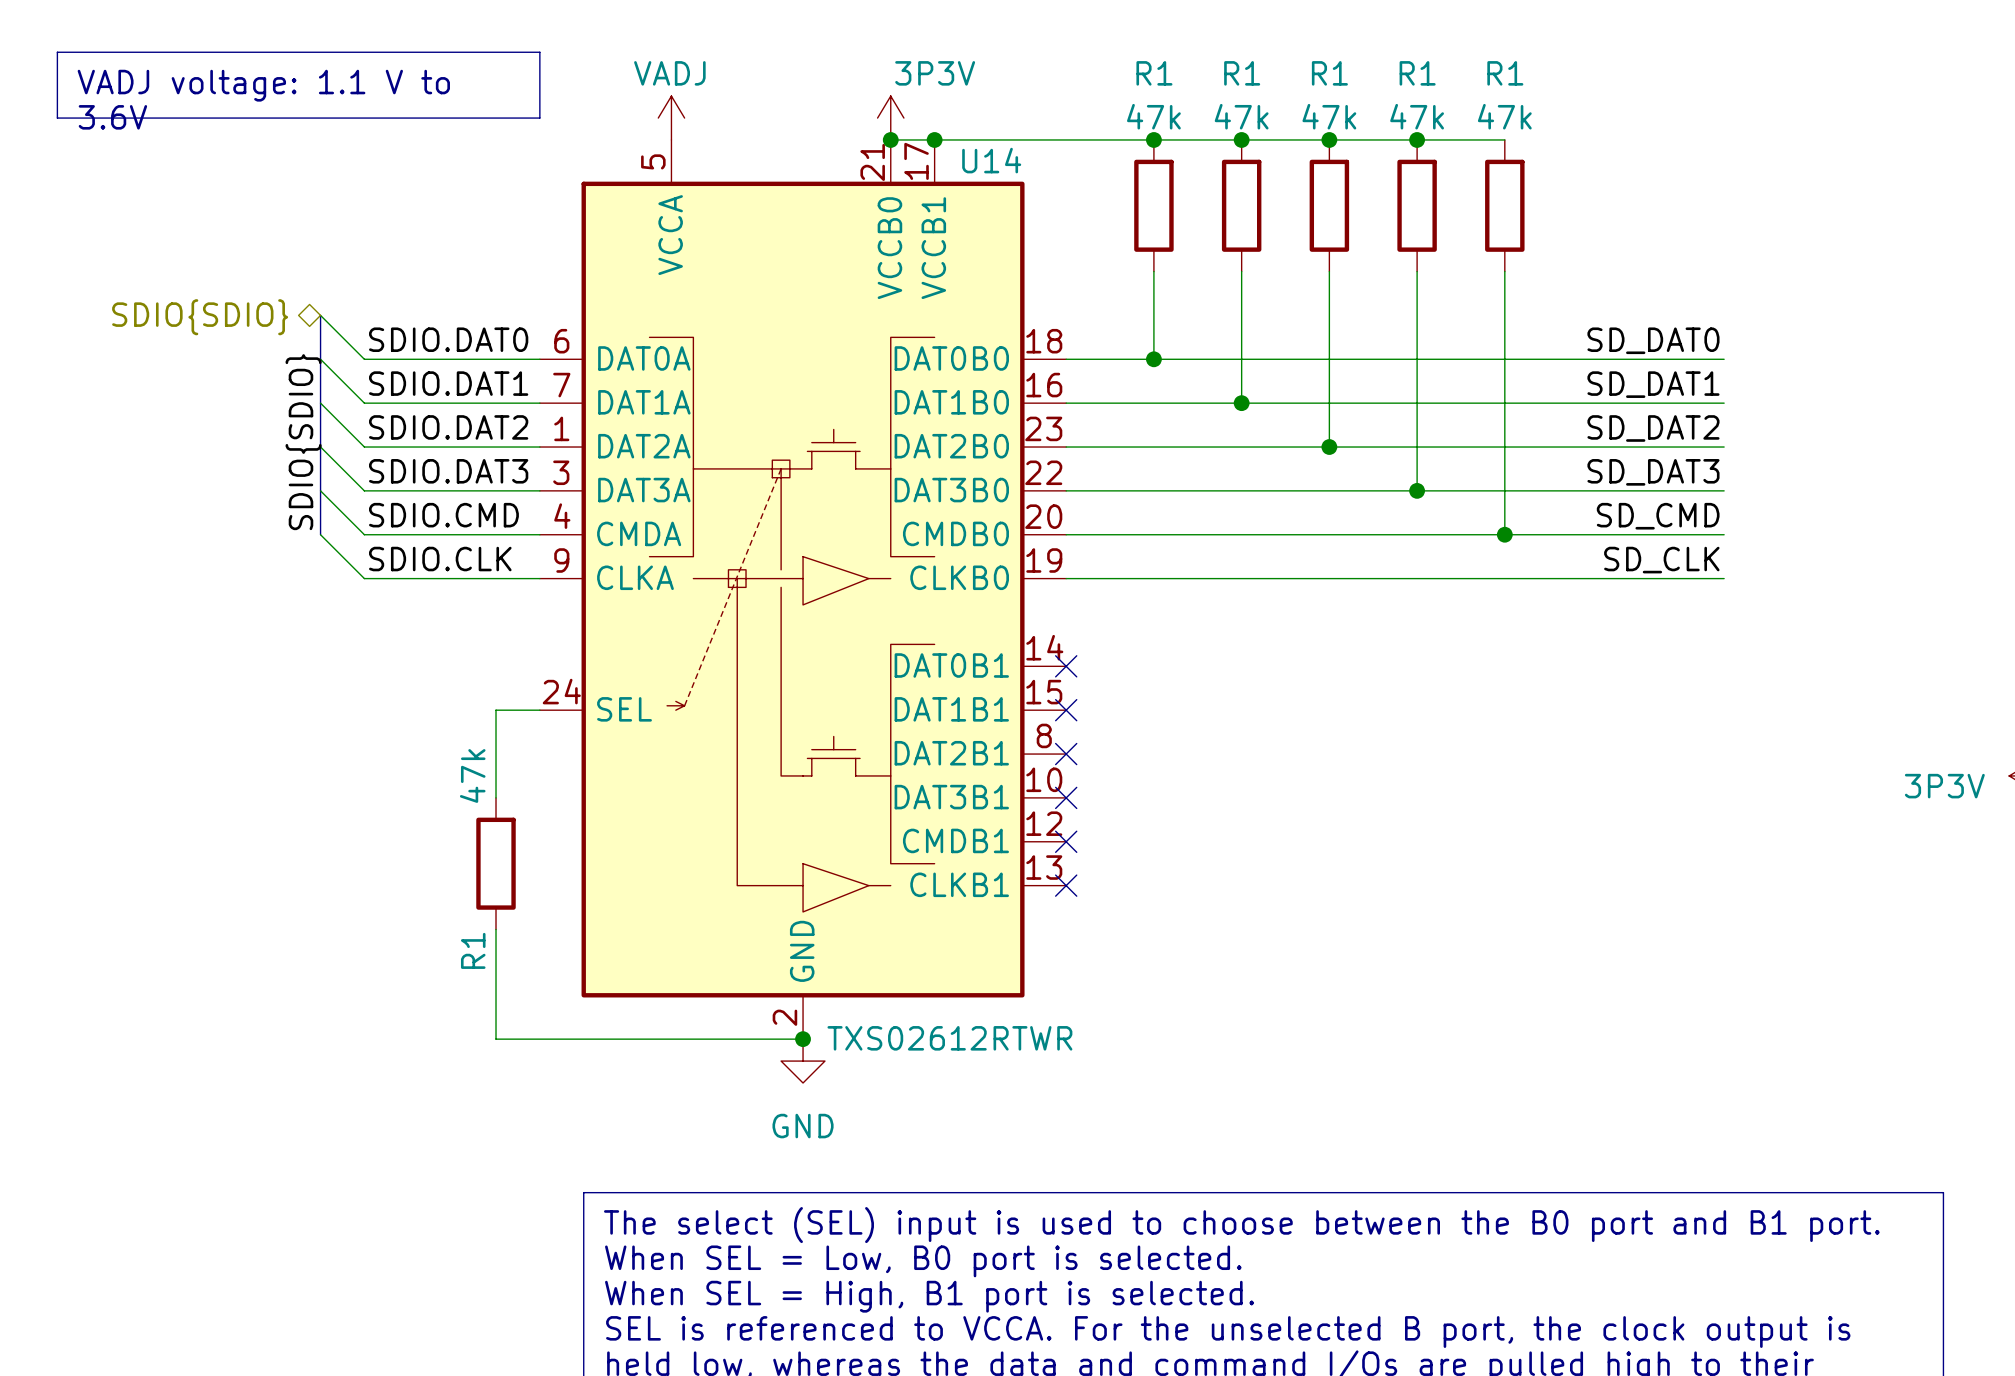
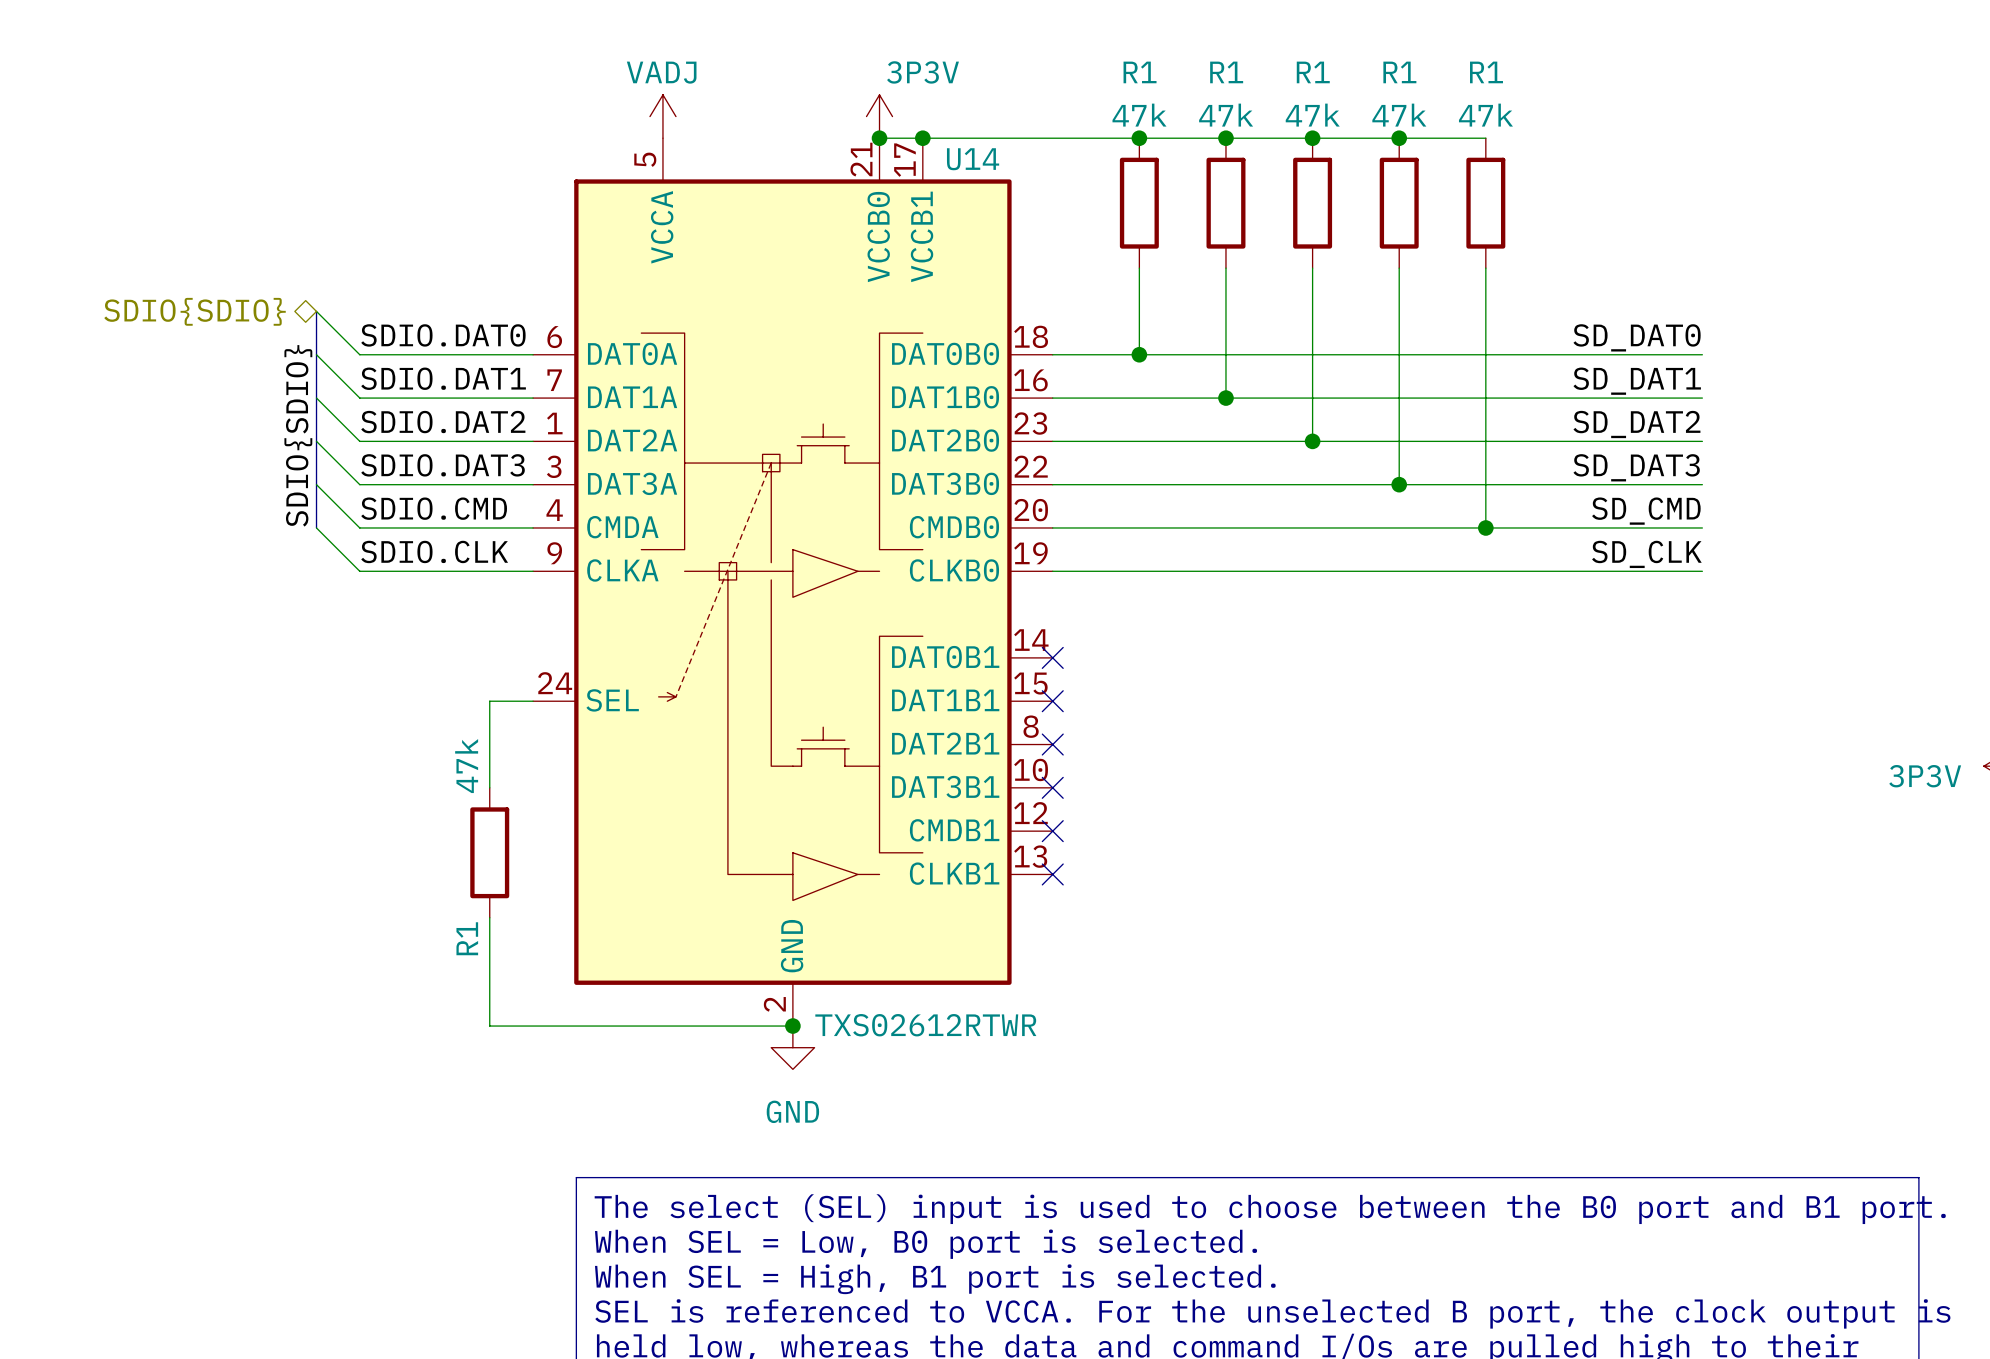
line: (57, 52) (539, 52) (539, 118) (57, 118) (57, 52) -> none
text: VADJ voltage: 1.1 V to (263, 85) -> none
text: 3.6V (112, 117) -> none

